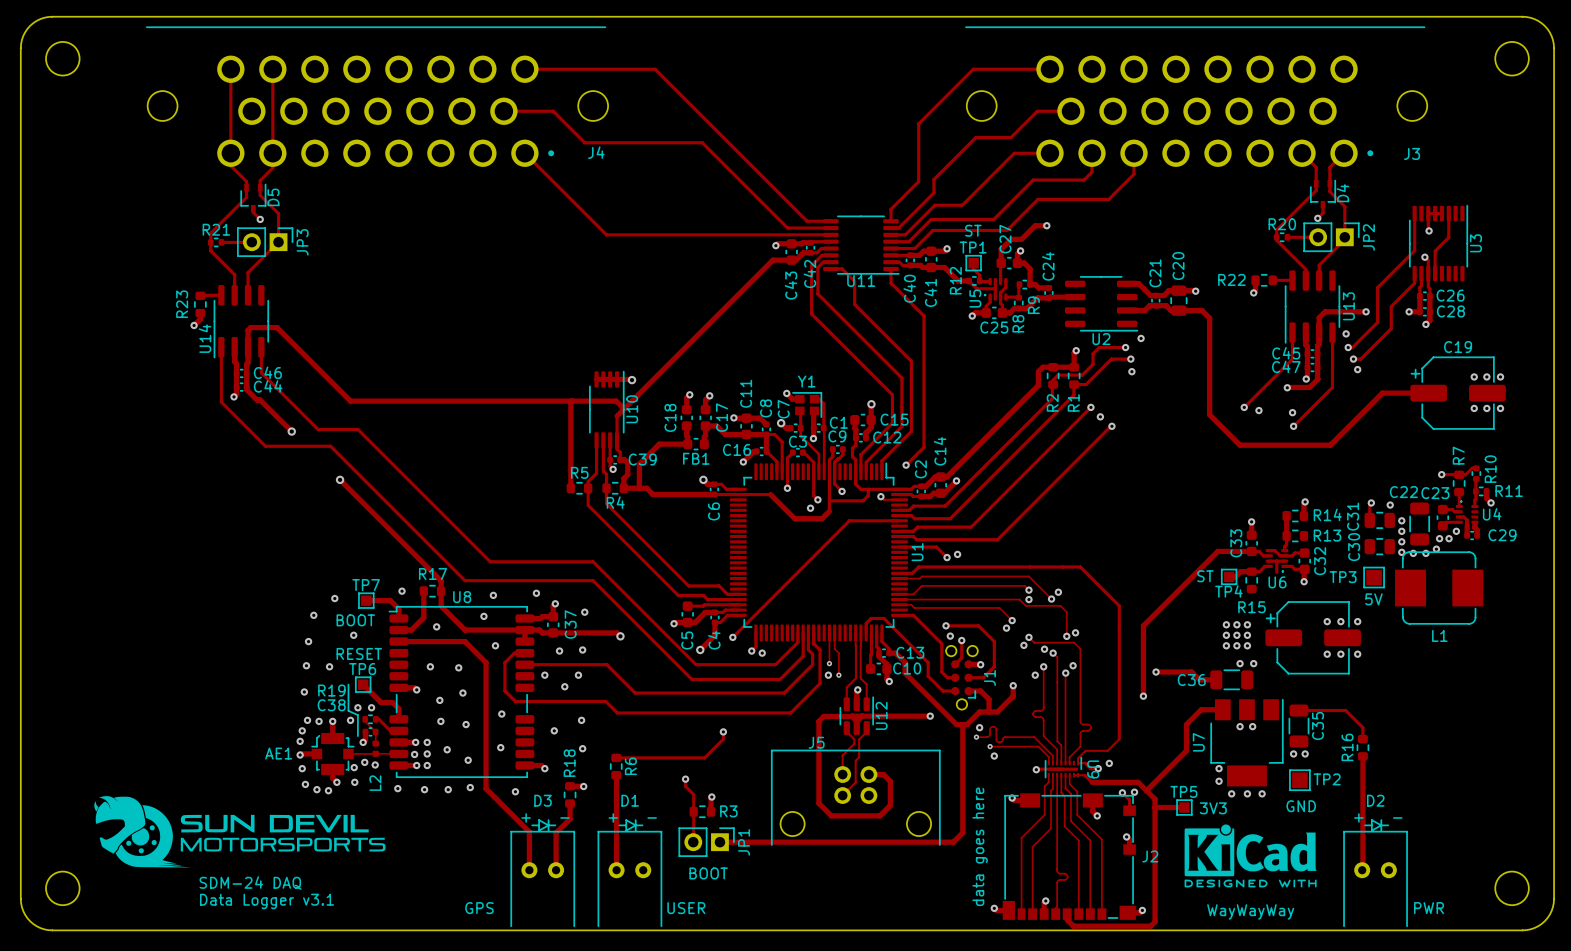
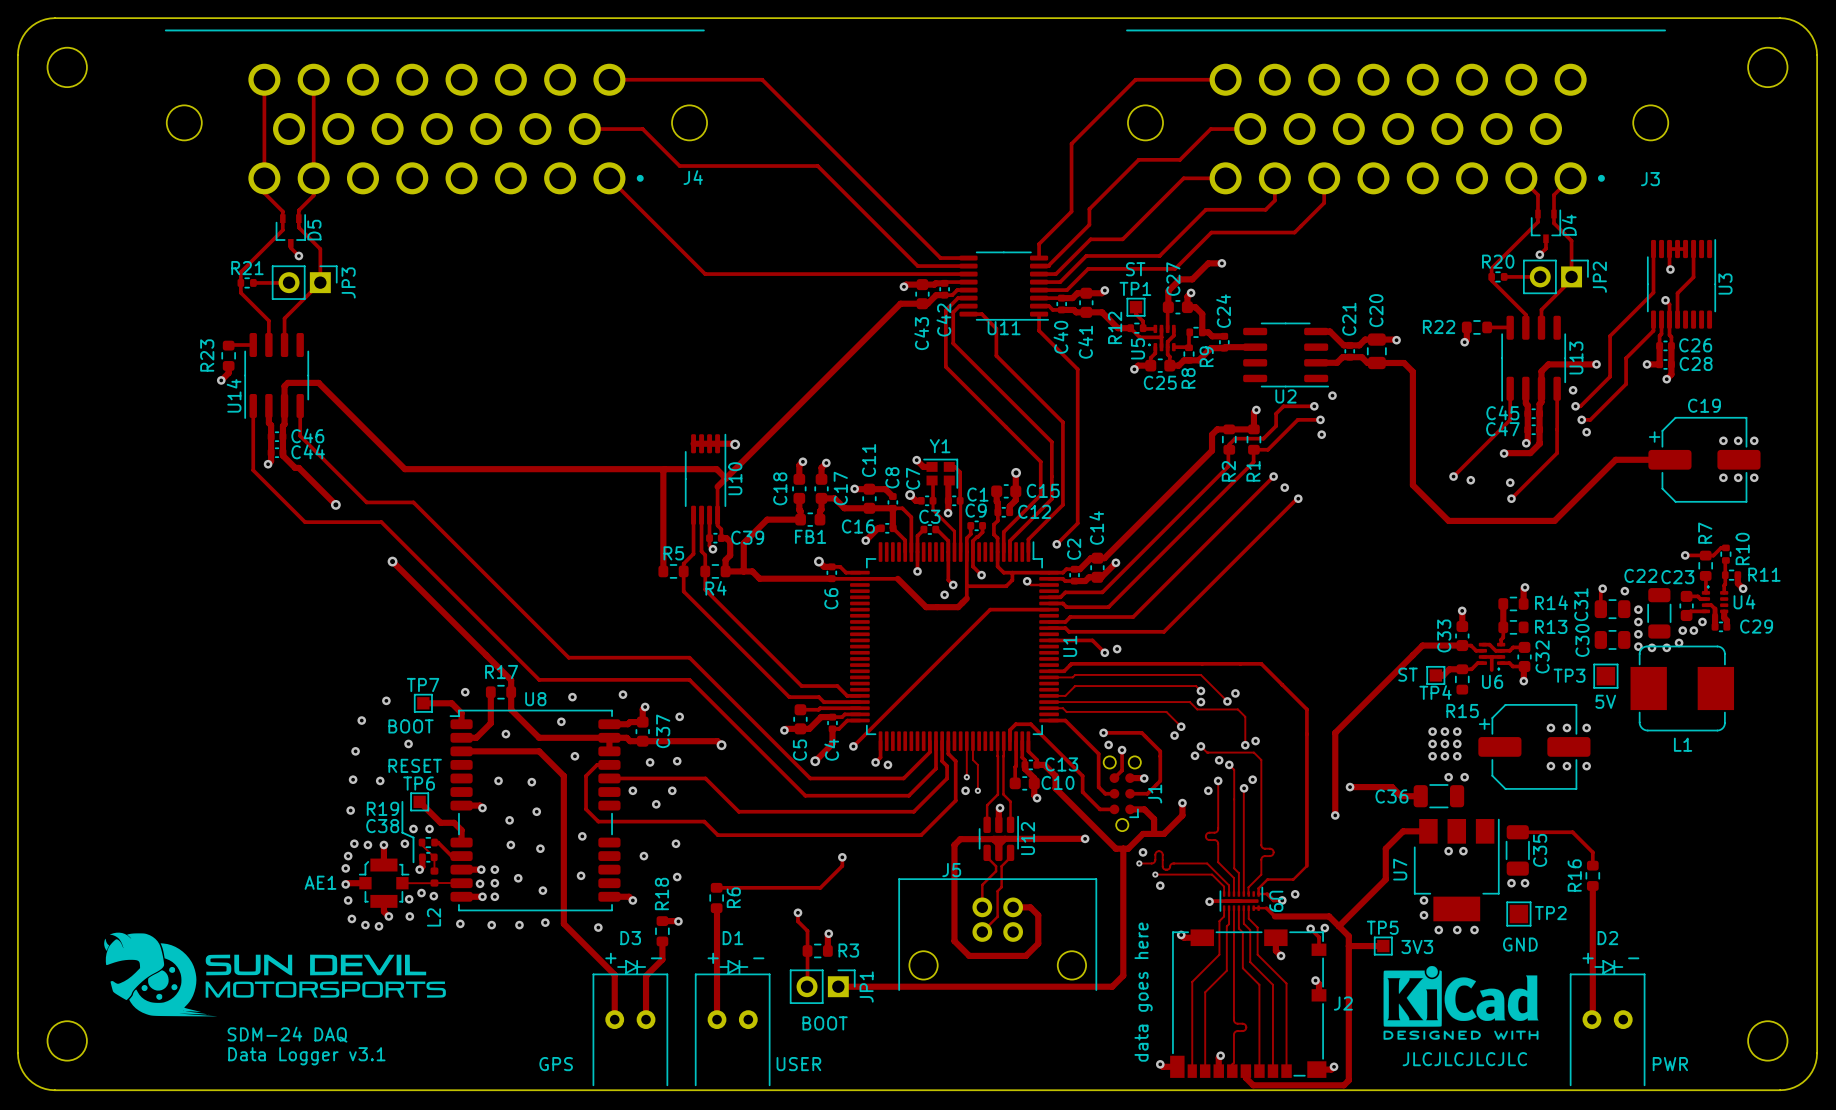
text: WayWayWay (1250, 911) -> JLCJLCJLCJLC (1464, 1059)

